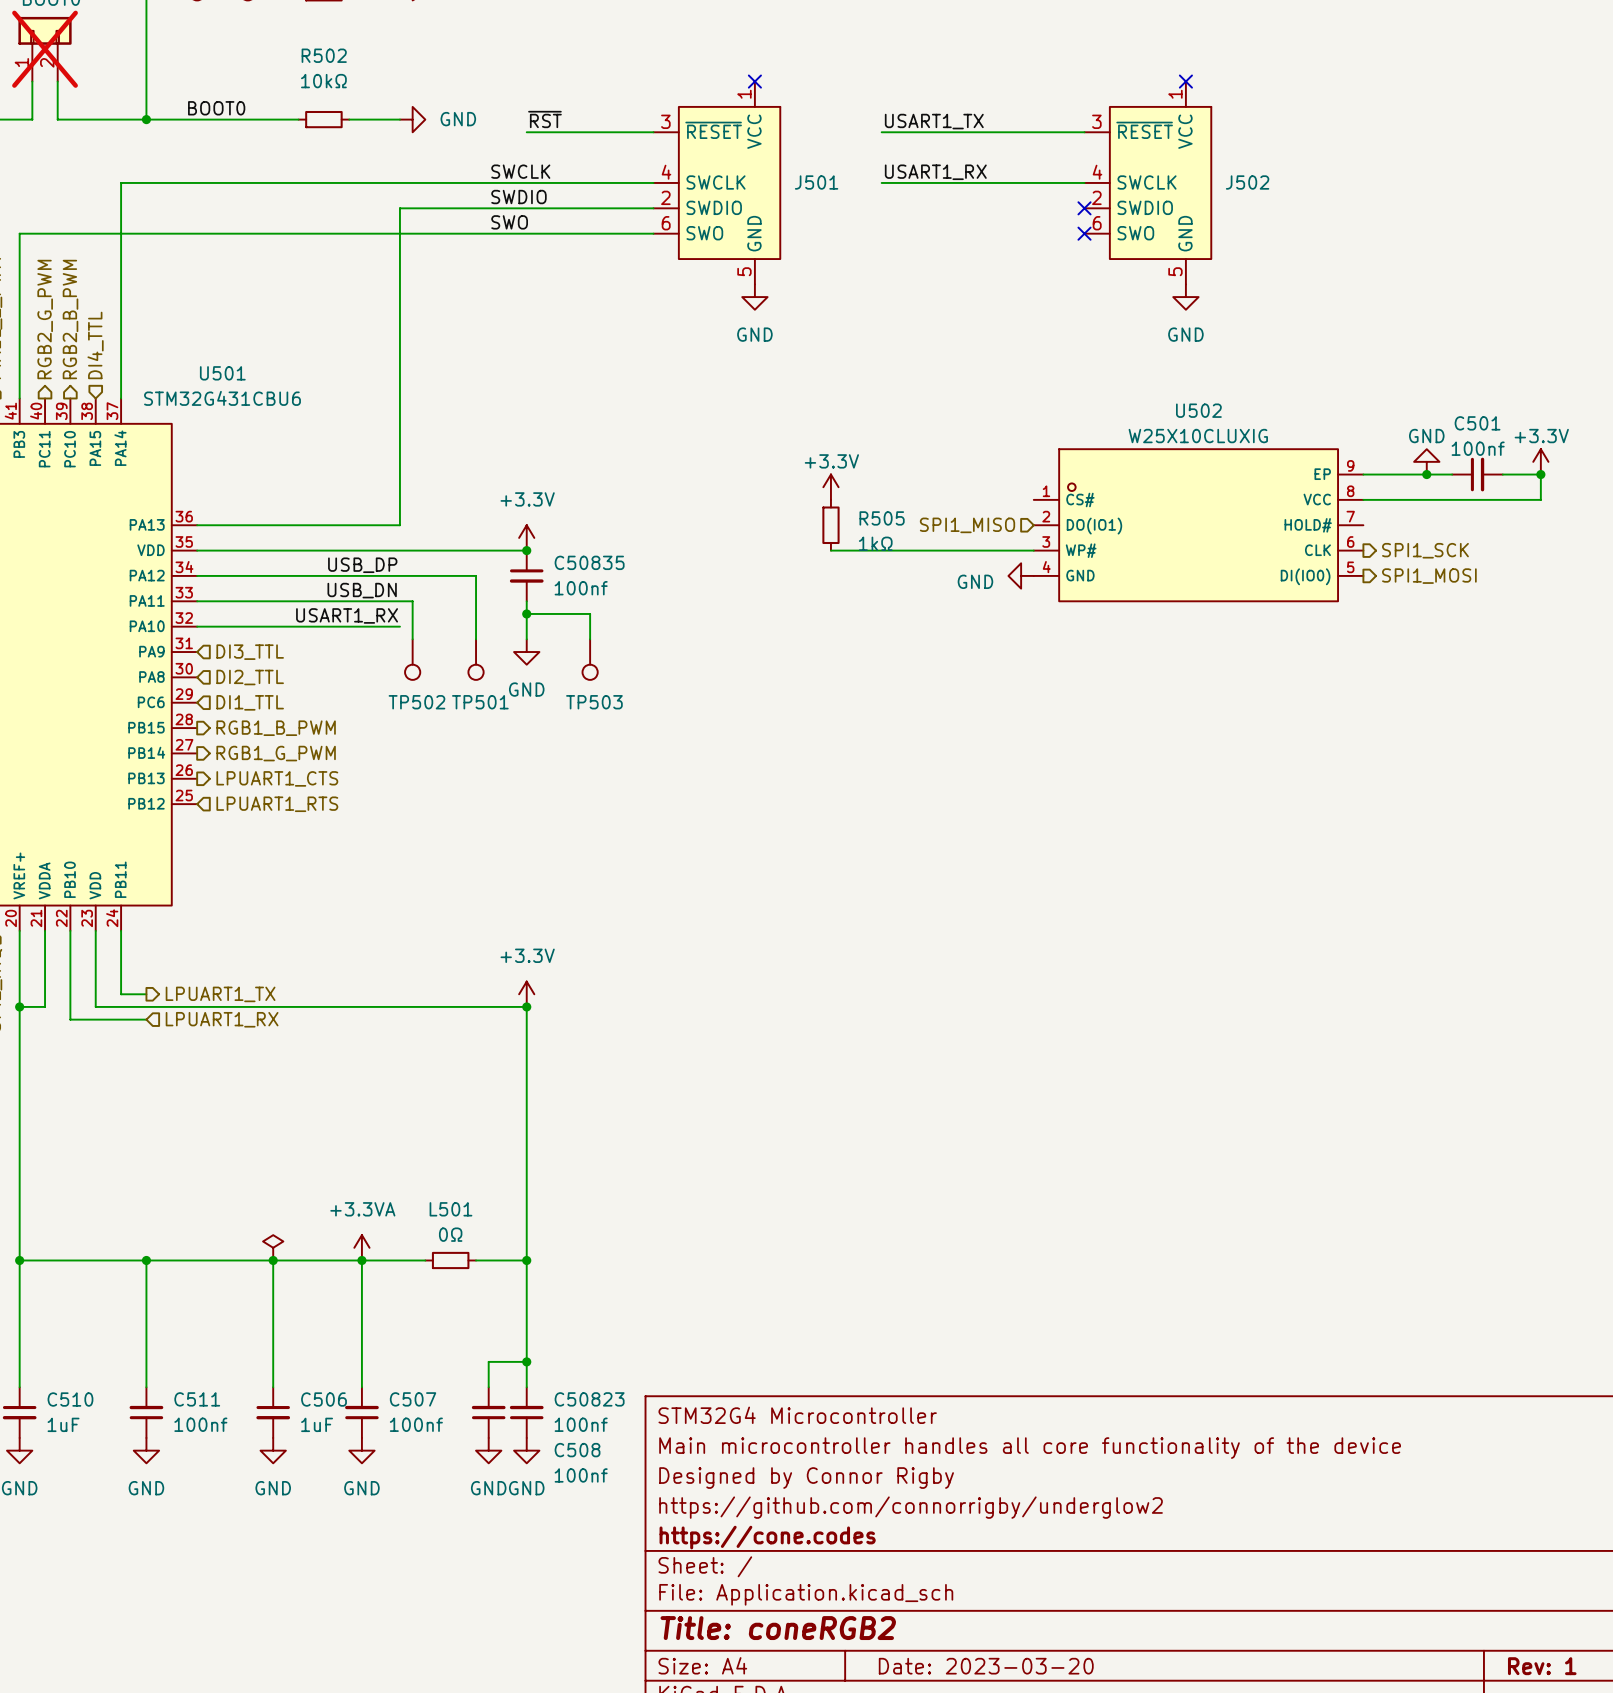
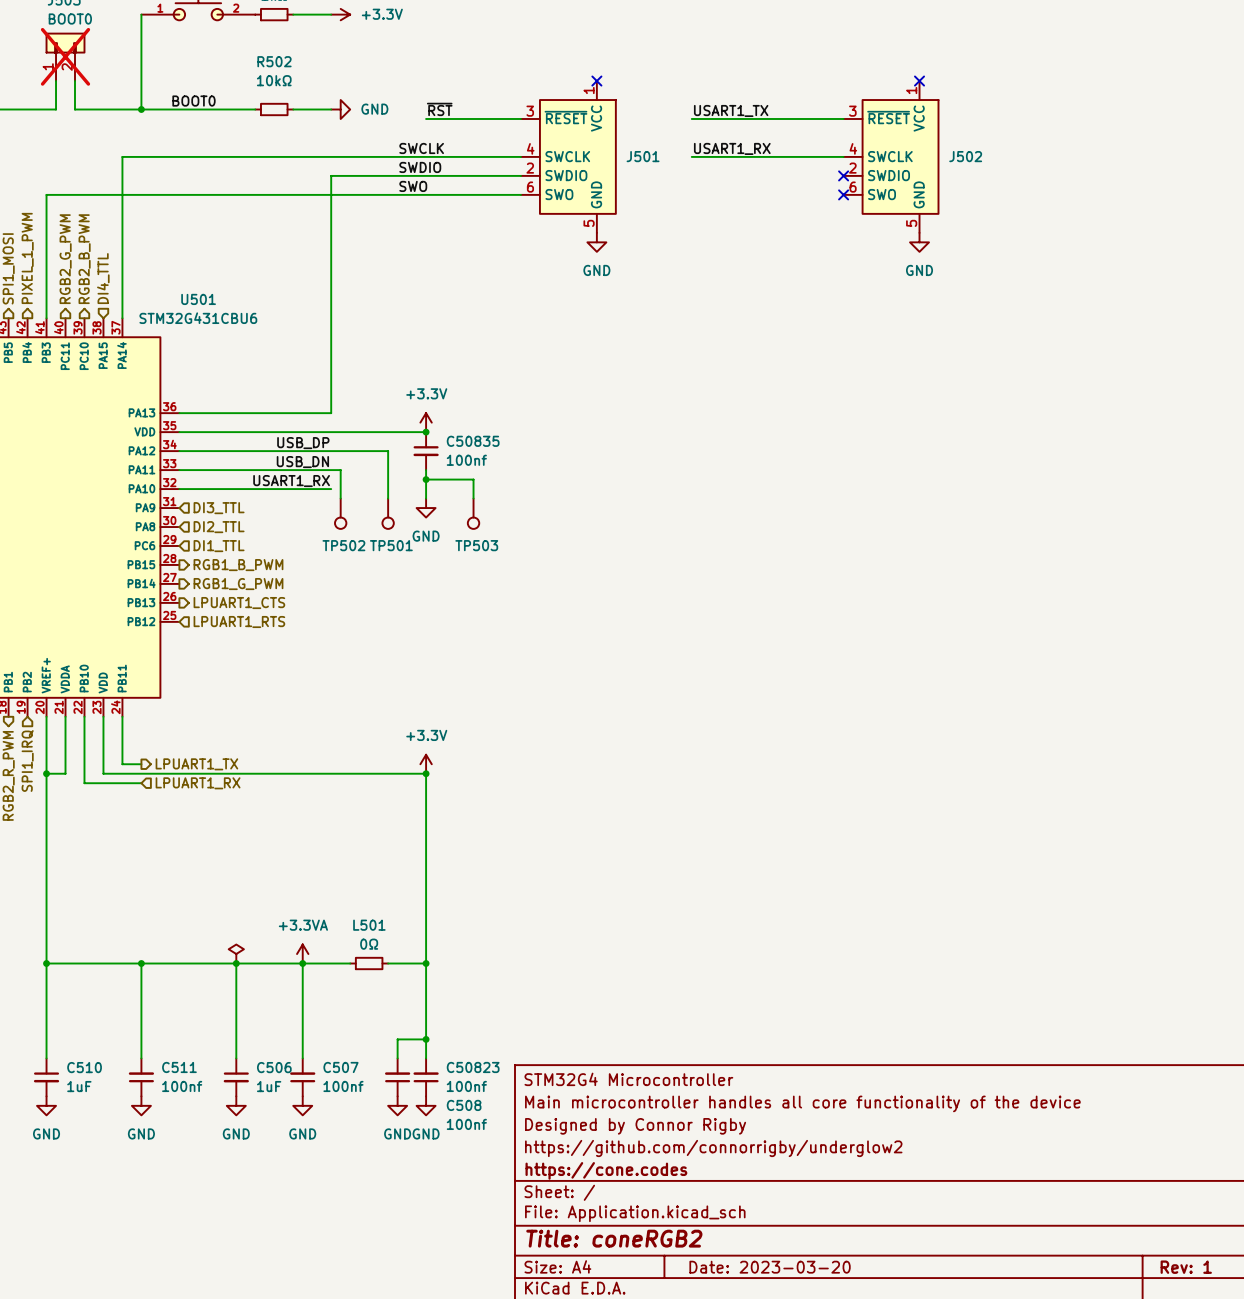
power symbol: GND (1426, 461) -> none
power symbol: +3.3V (1540, 461) -> none
wire: (1363, 474) (1452, 474) -> none
junction: (1426, 474) -> none
C501: (1477, 474) -> none
wire: (1502, 474) (1540, 474) (1540, 499) (1363, 499) -> none
junction: (1540, 474) -> none
power symbol: +3.3V (830, 487) -> none
R505: (830, 525) -> none
hierarchical label: SPI1_MISO (967, 525) -> none
U502: W25X10CLUXIG (1198, 525) -> none
wire: (830, 550) (1033, 550) -> none
hierarchical label: SPI1_SCK (1425, 550) -> none
power symbol: GND (1021, 575) -> none
hierarchical label: SPI1_MOSI (1429, 576) -> none

